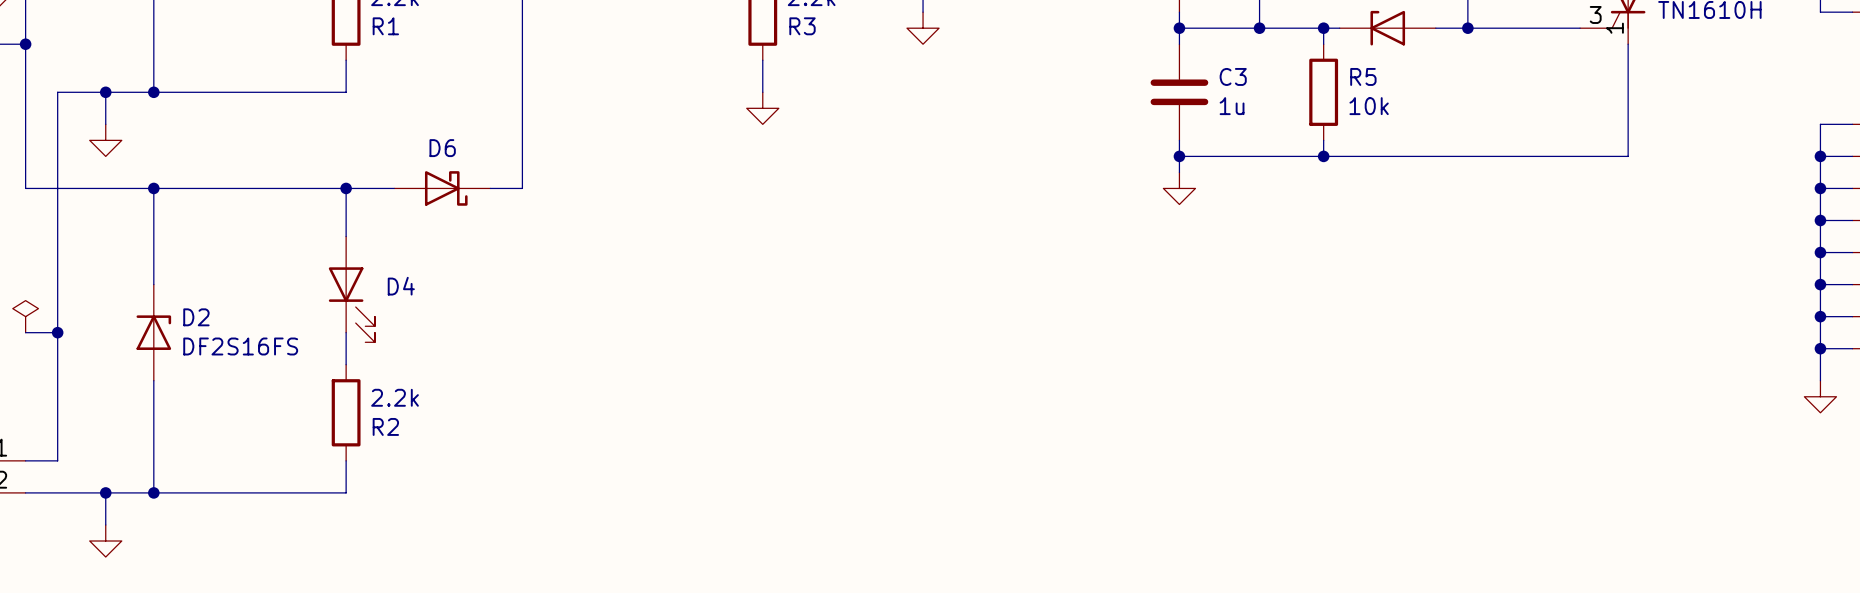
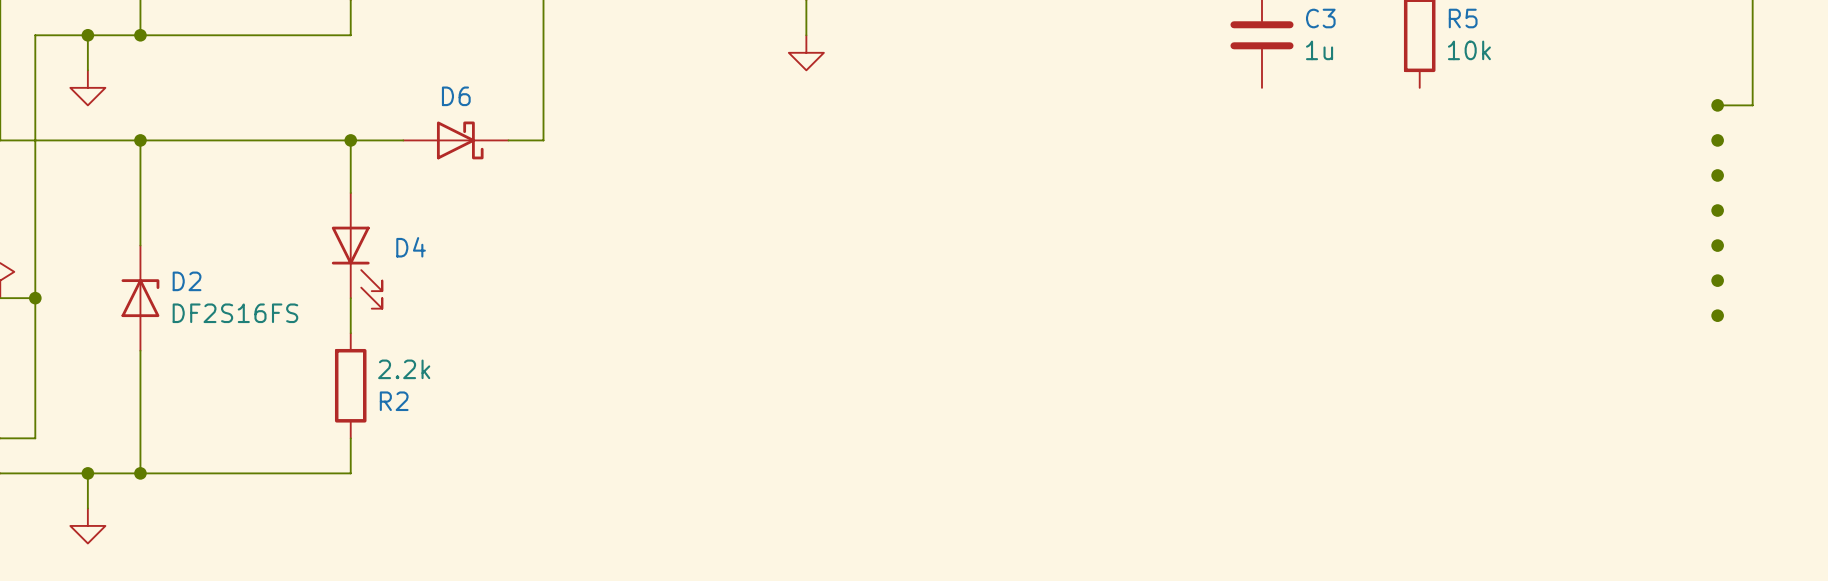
wire: (1179, 140) (1179, 172) -> none
wire: (1323, 140) (1323, 156) -> none
wire: (1179, 156) (1596, 156) -> none
junction: (1179, 156) -> none
junction: (1323, 156) -> none
junction: none -> (1717, 105)
power symbol: (1179, 188) -> none
junction: none -> (1717, 140)
junction: none -> (1717, 175)
junction: none -> (1717, 210)
junction: none -> (1717, 245)
junction: none -> (1717, 280)
junction: none -> (1717, 315)

